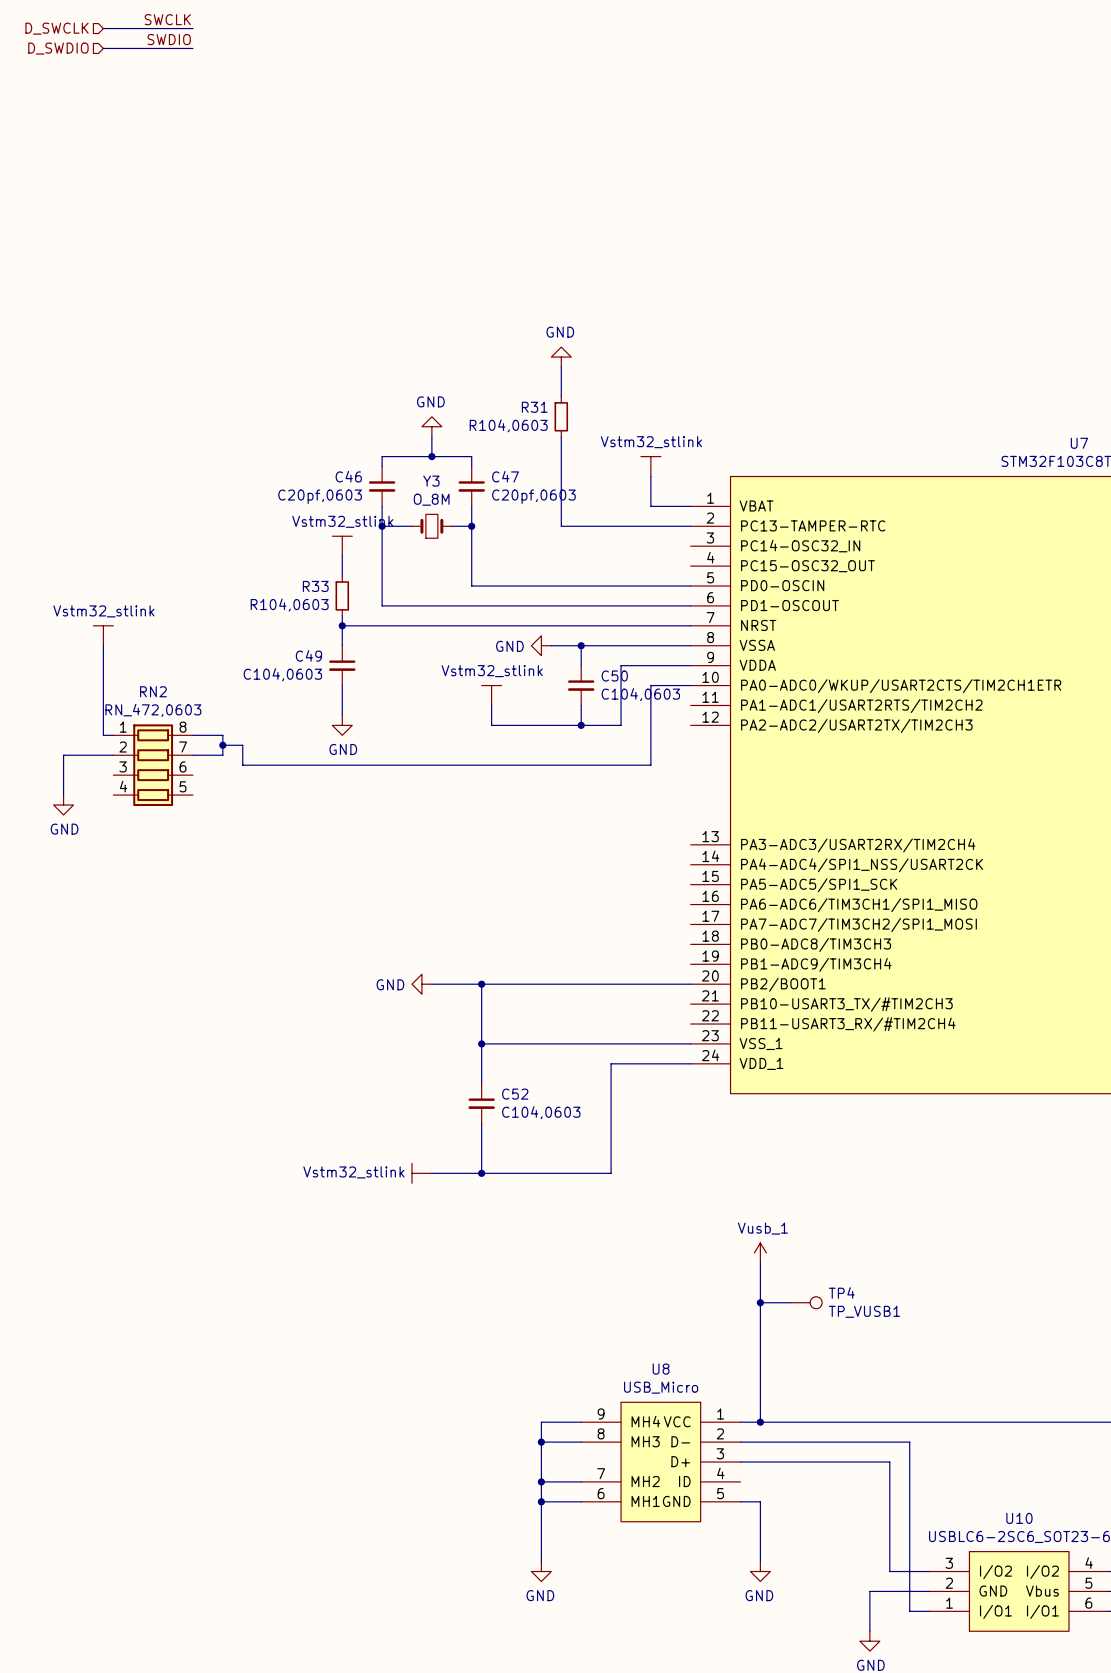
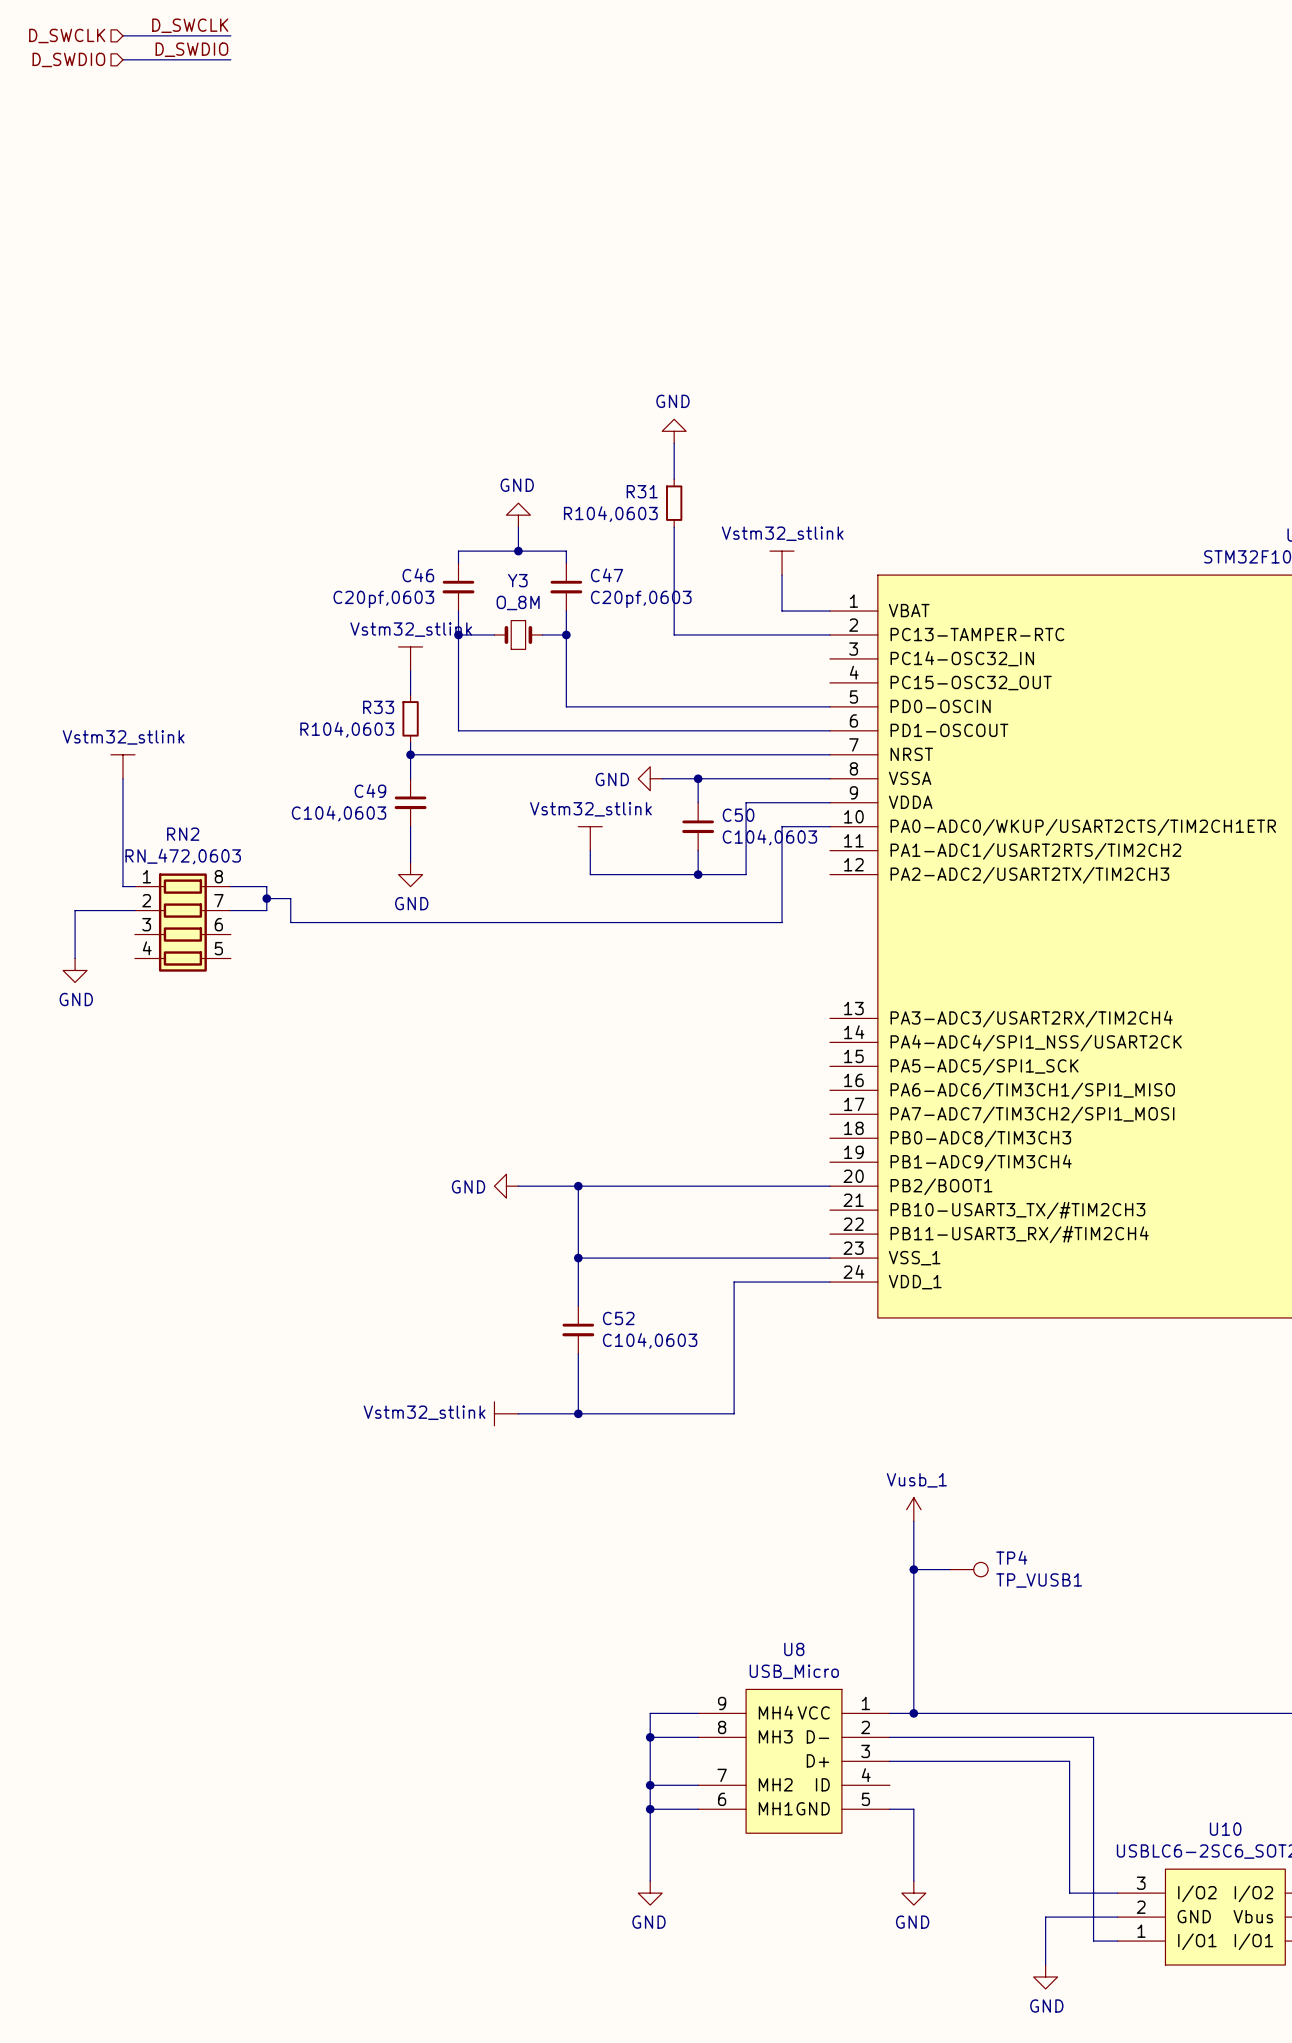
label: SWCLK (167, 19) -> D_SWCLK (190, 25)
label: SWDIO (169, 39) -> D_SWDIO (191, 49)

